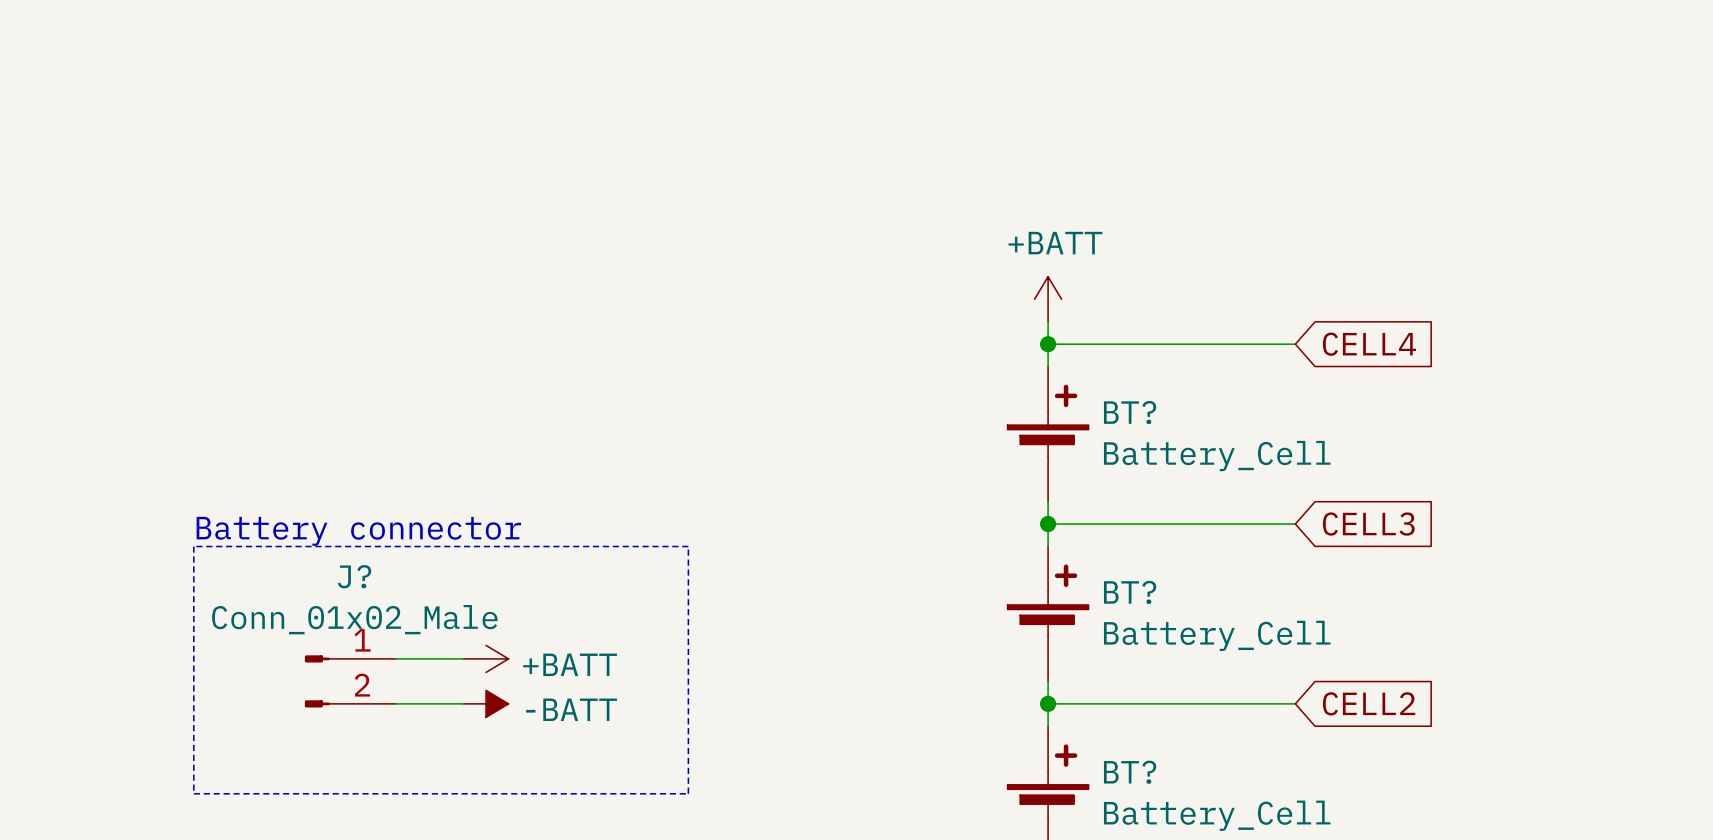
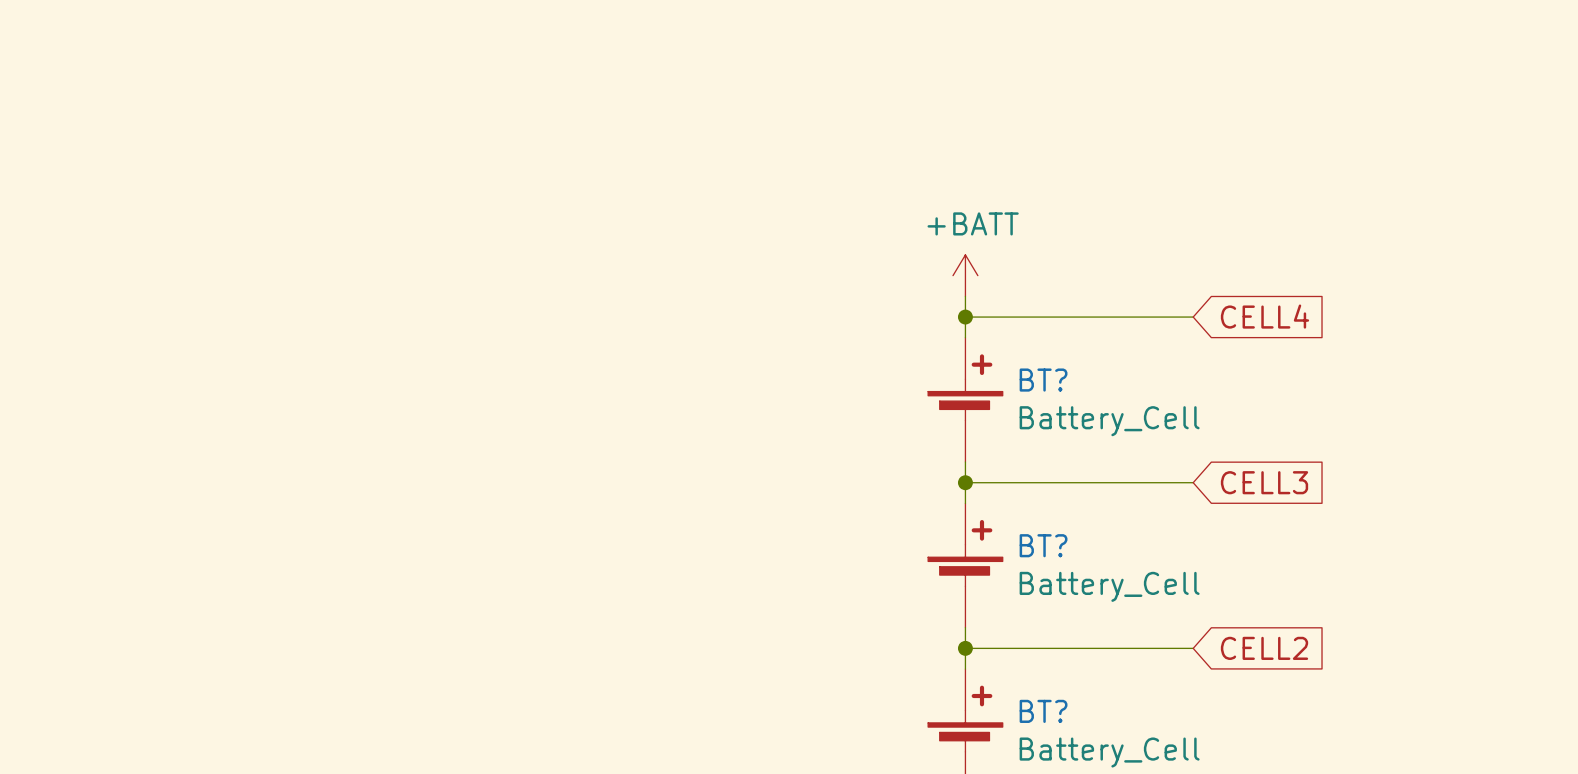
text: Battery connector (358, 531) -> none
line: (193, 546) (193, 793) (688, 793) (688, 546) (193, 546) -> none
wire: (396, 658) (463, 658) -> none
power symbol: +BATT (486, 658) -> none
J?: Conn_01x02_Male (350, 681) -> none
wire: (396, 703) (463, 703) -> none
power symbol: -BATT (486, 703) -> none

